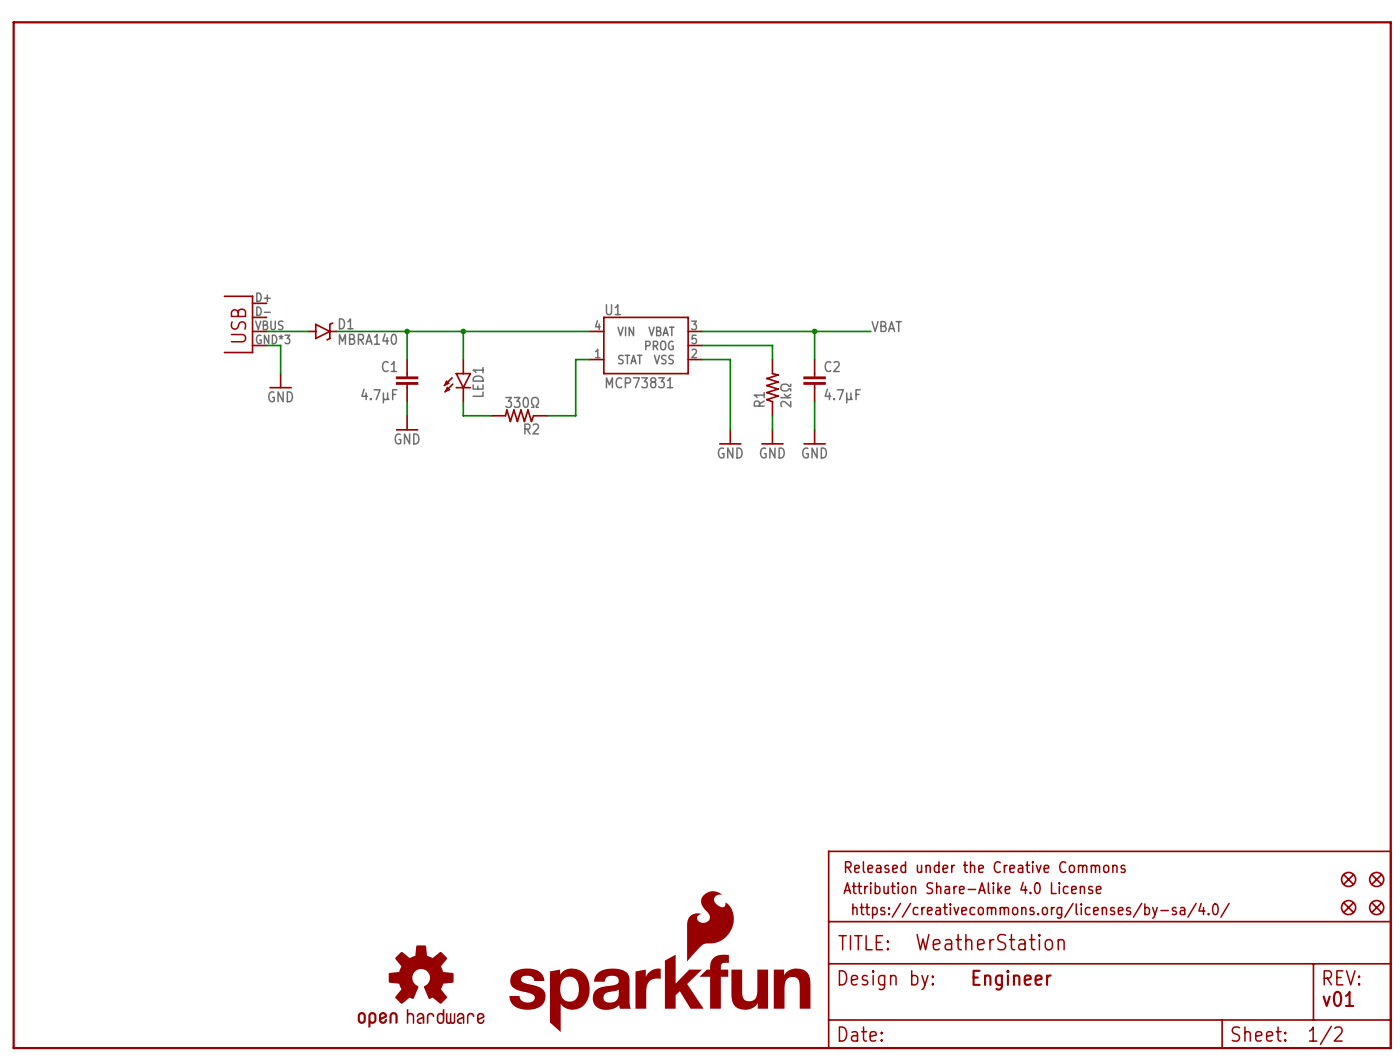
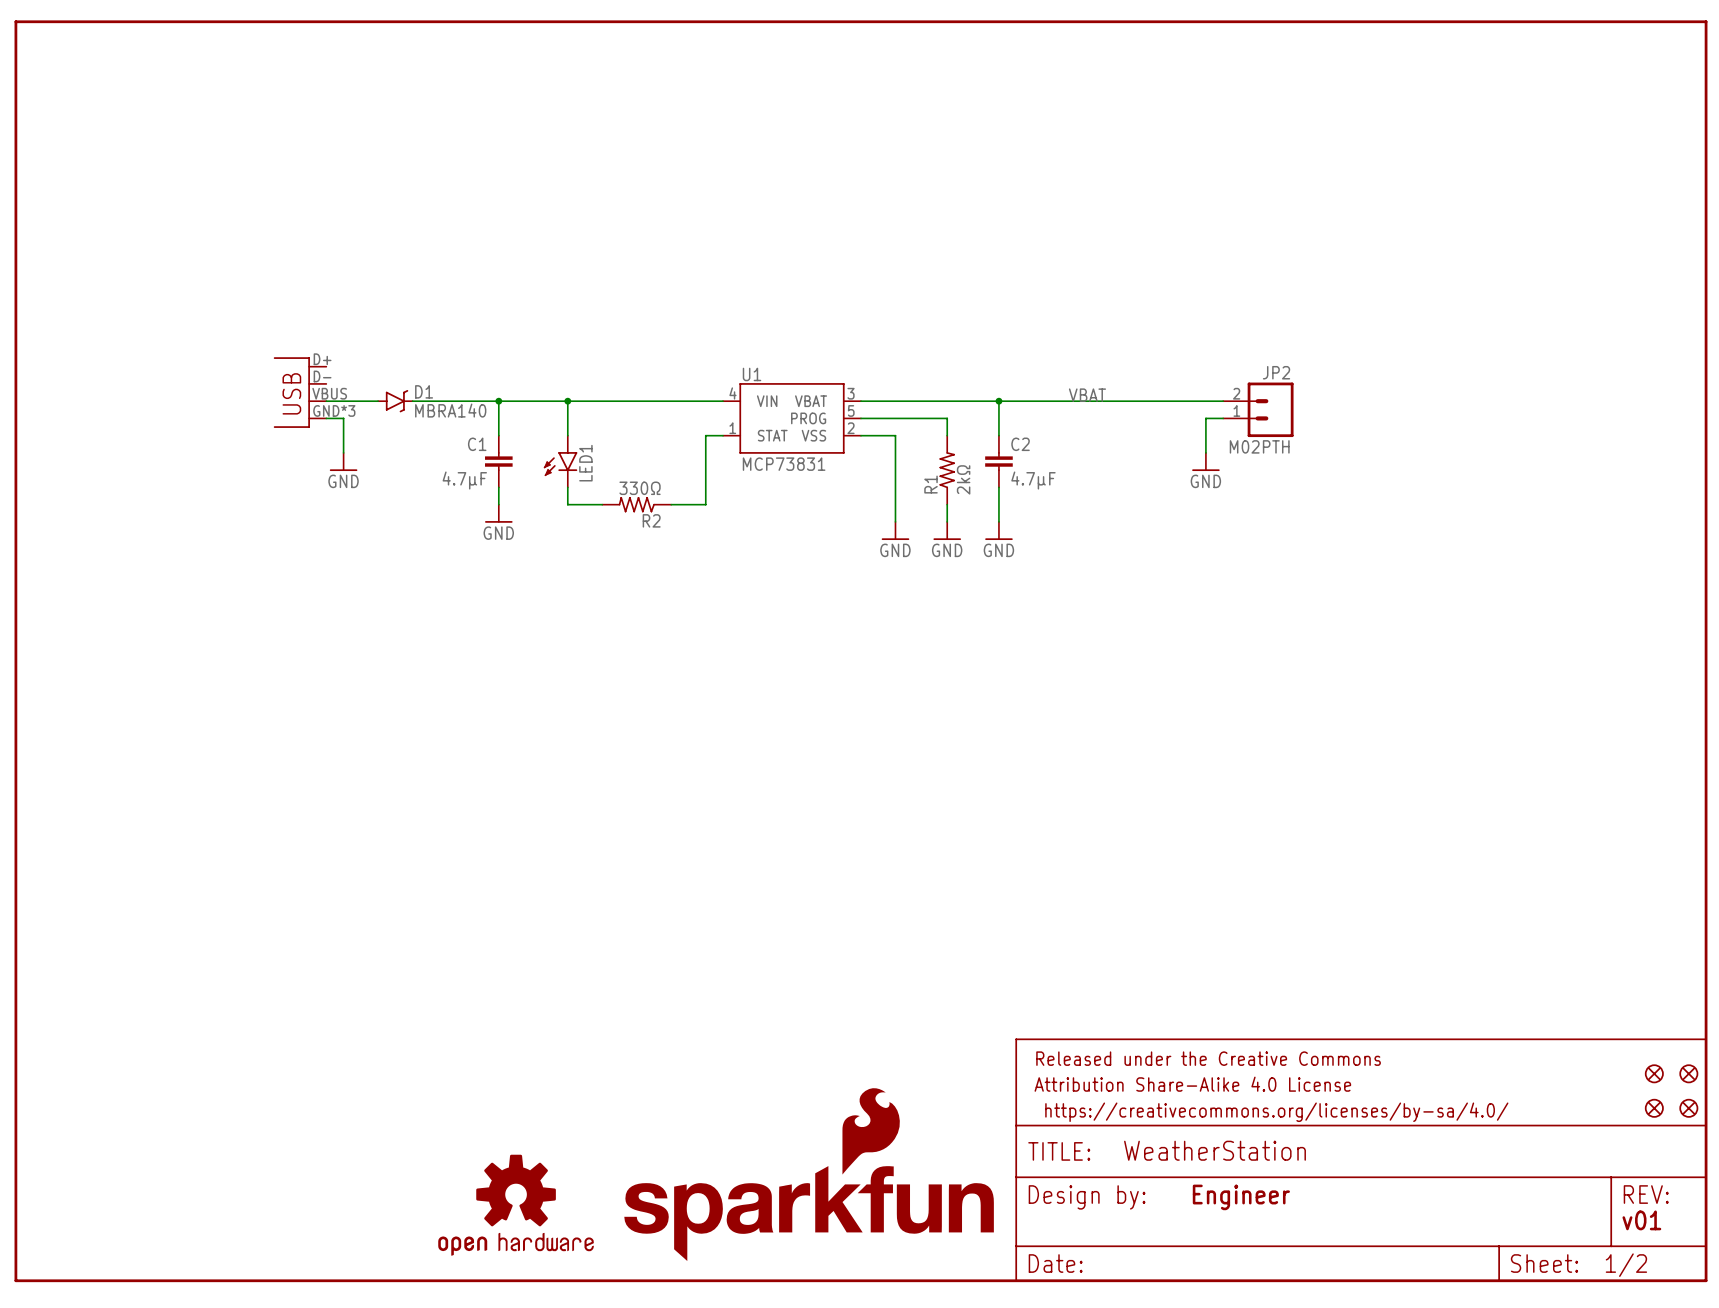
wire: none -> (1067, 401) (1223, 401)
JP2: none -> M02PTH (1258, 409)
wire: none -> (1223, 418) (1205, 418) (1205, 452)
power symbol: none -> GND (1205, 461)

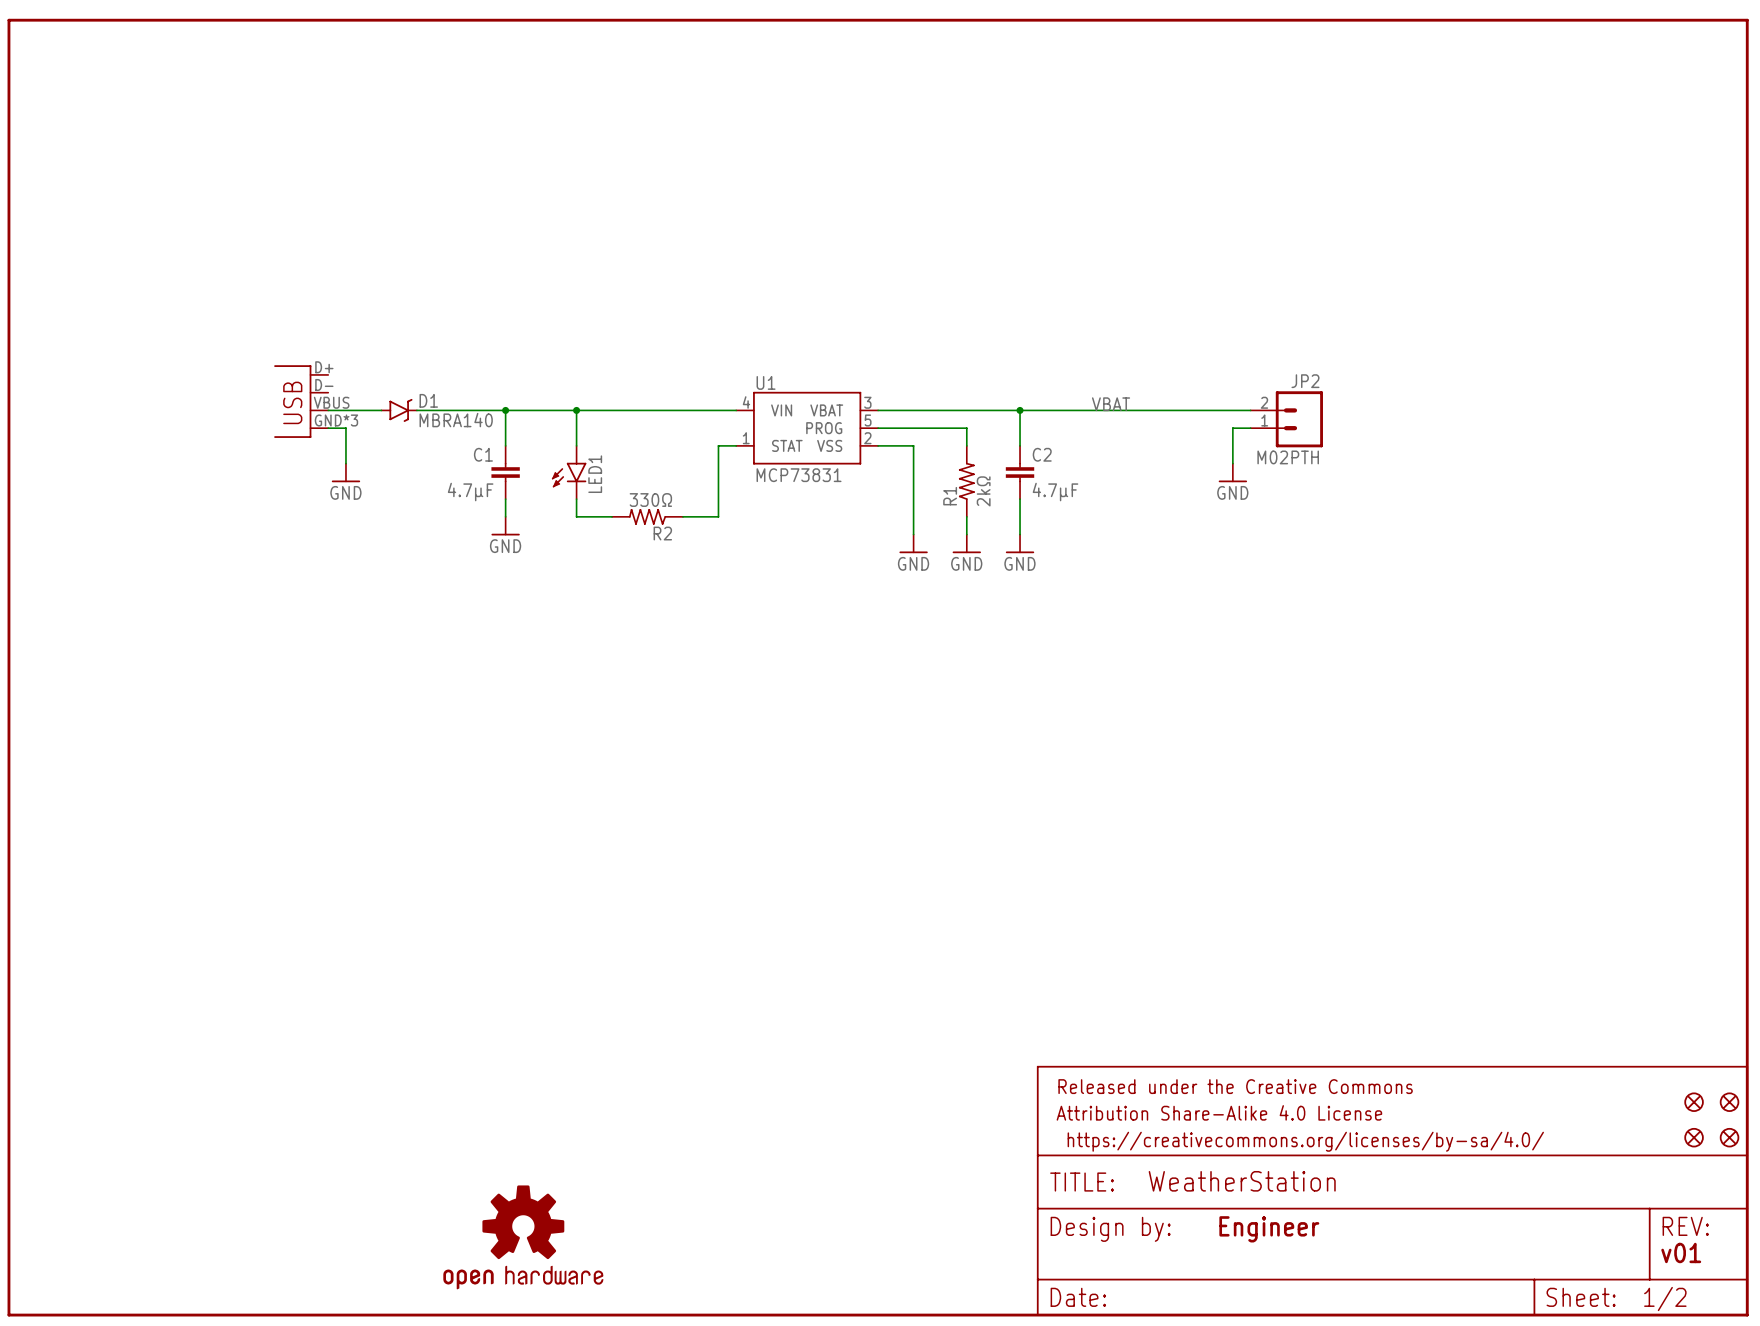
part: (809, 1174) -> none

